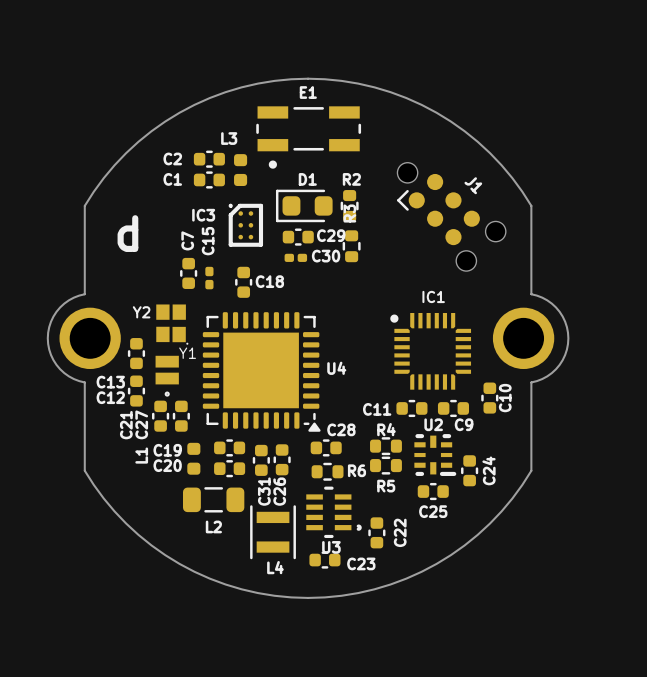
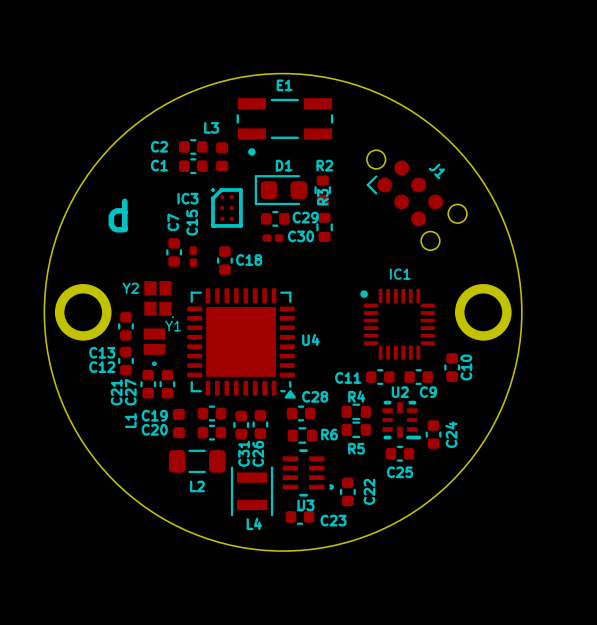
board edge: (308, 78) (358, 83) (406, 98) (450, 121) (490, 153) (512, 178) (531, 205) (531, 294) (542, 297) (555, 307) (565, 321) (568, 338) (565, 354) (556, 369) (542, 379) (531, 382) (531, 470) (512, 498) (490, 523) (450, 555) (406, 578) (358, 593) (308, 597) (257, 593) (209, 578) (165, 555) (126, 523) (103, 498) (84, 470) (84, 382) (68, 376) (56, 364) (51, 354) (47, 338) (51, 321) (60, 307) (73, 297) (84, 294) (84, 205) (103, 178) (126, 153) (165, 121) (209, 98) (257, 83) (308, 78) -> none
round board edge: none -> [43, 73, 523, 552]

